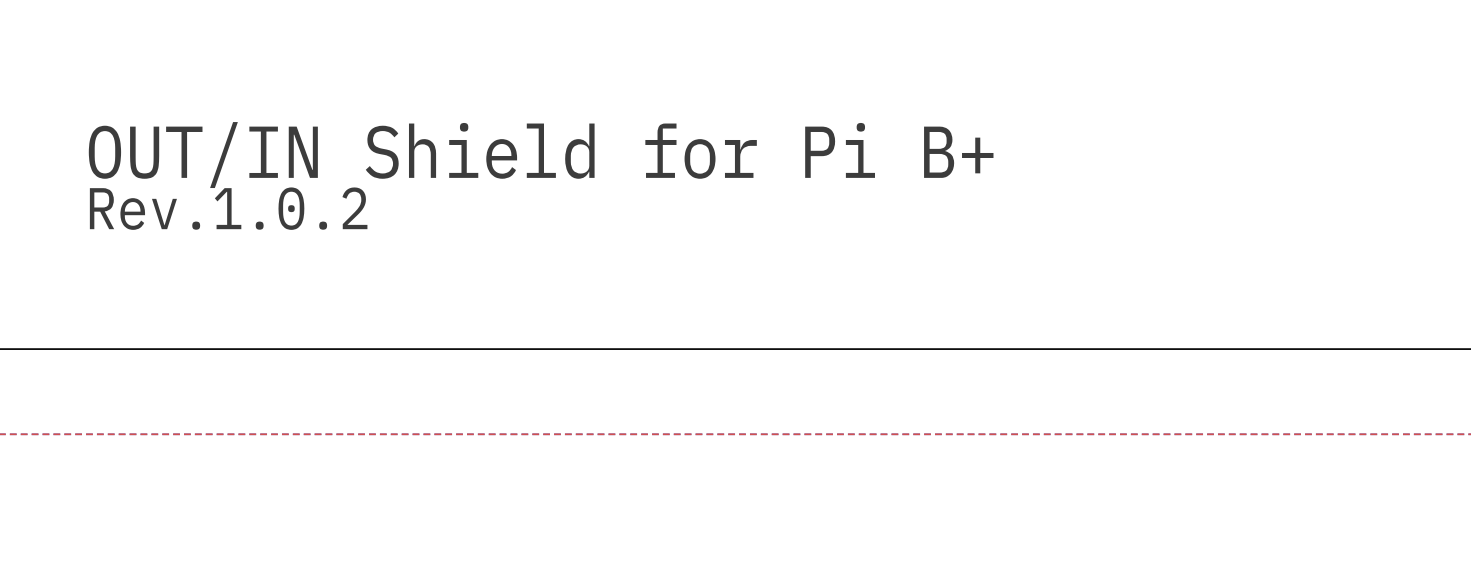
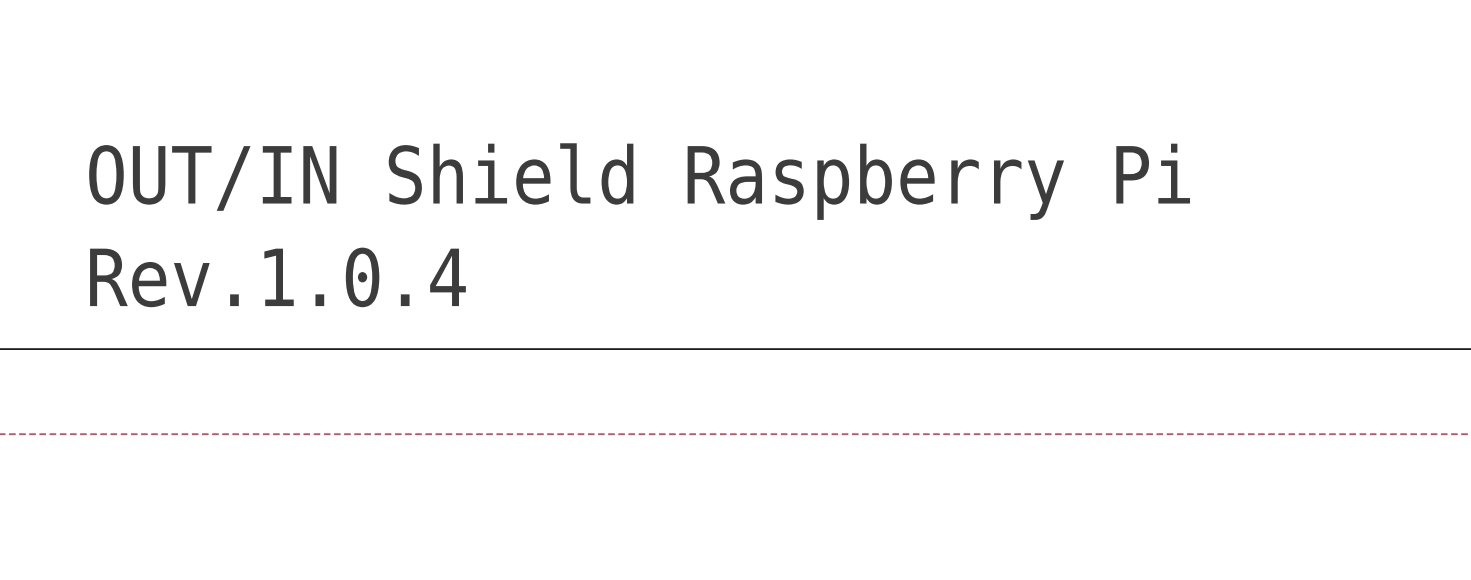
text: OUT/IN Shield for Pi B+ (541, 155) -> OUT/IN Shield Raspberry Pi (639, 181)
text: Rev.1.0.2 (228, 208) -> Rev.1.0.4 (277, 277)

